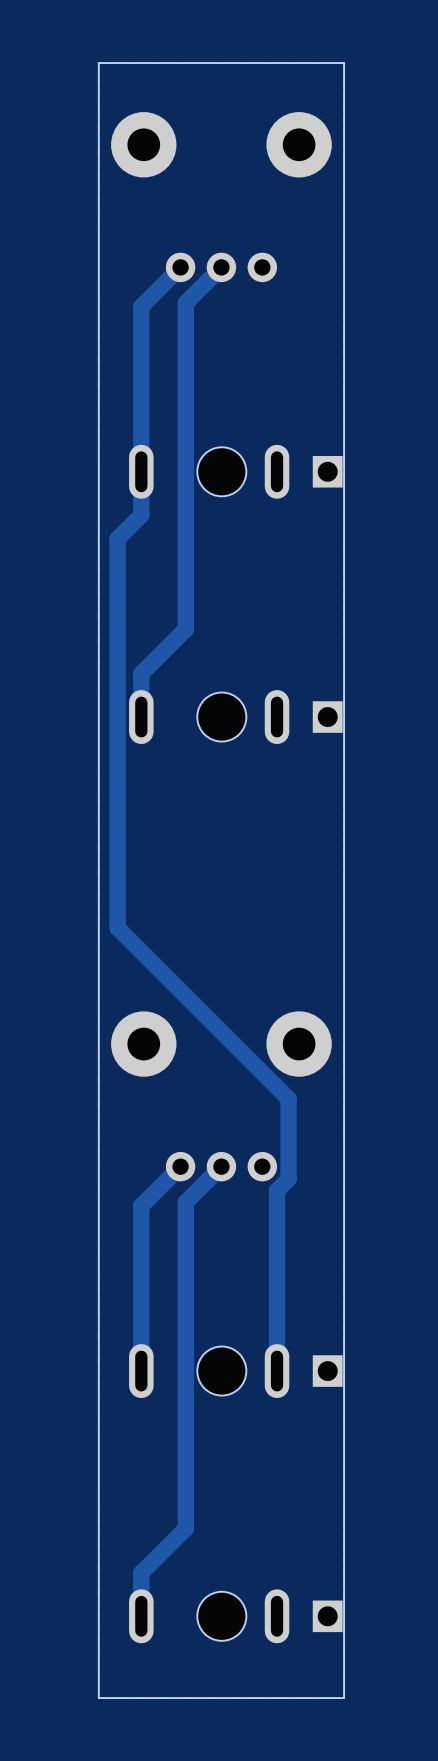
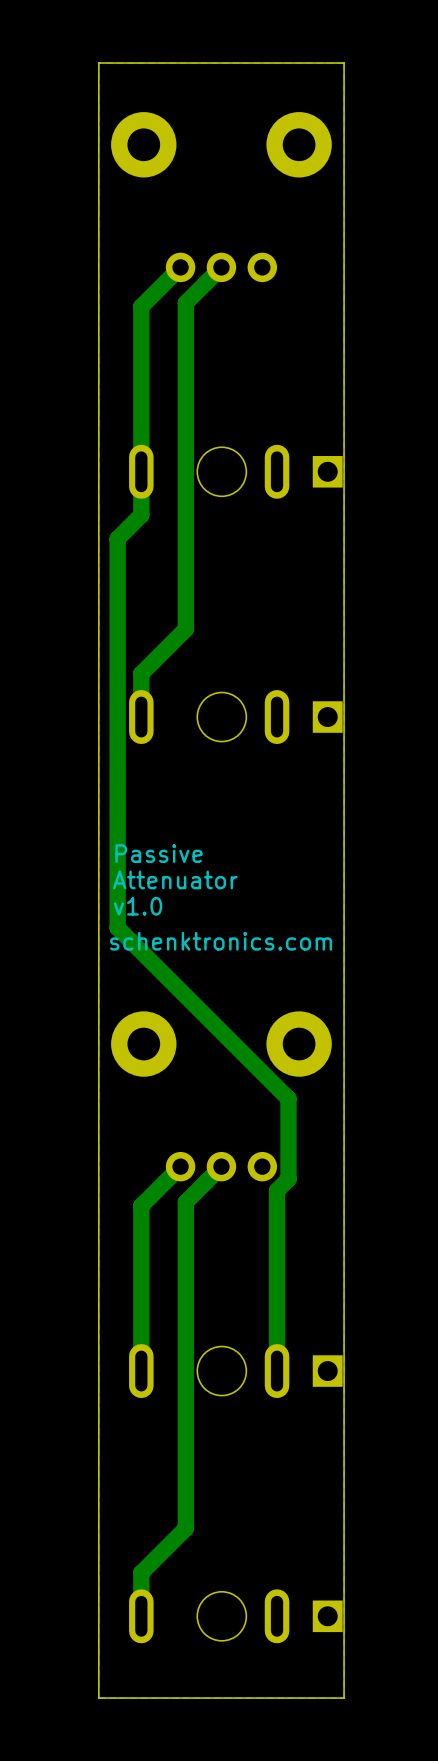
text: none -> Passive (159, 853)
text: none -> Attenuator (175, 879)
text: none -> v1.0 (138, 906)
text: none -> schenktronics.com (221, 941)

